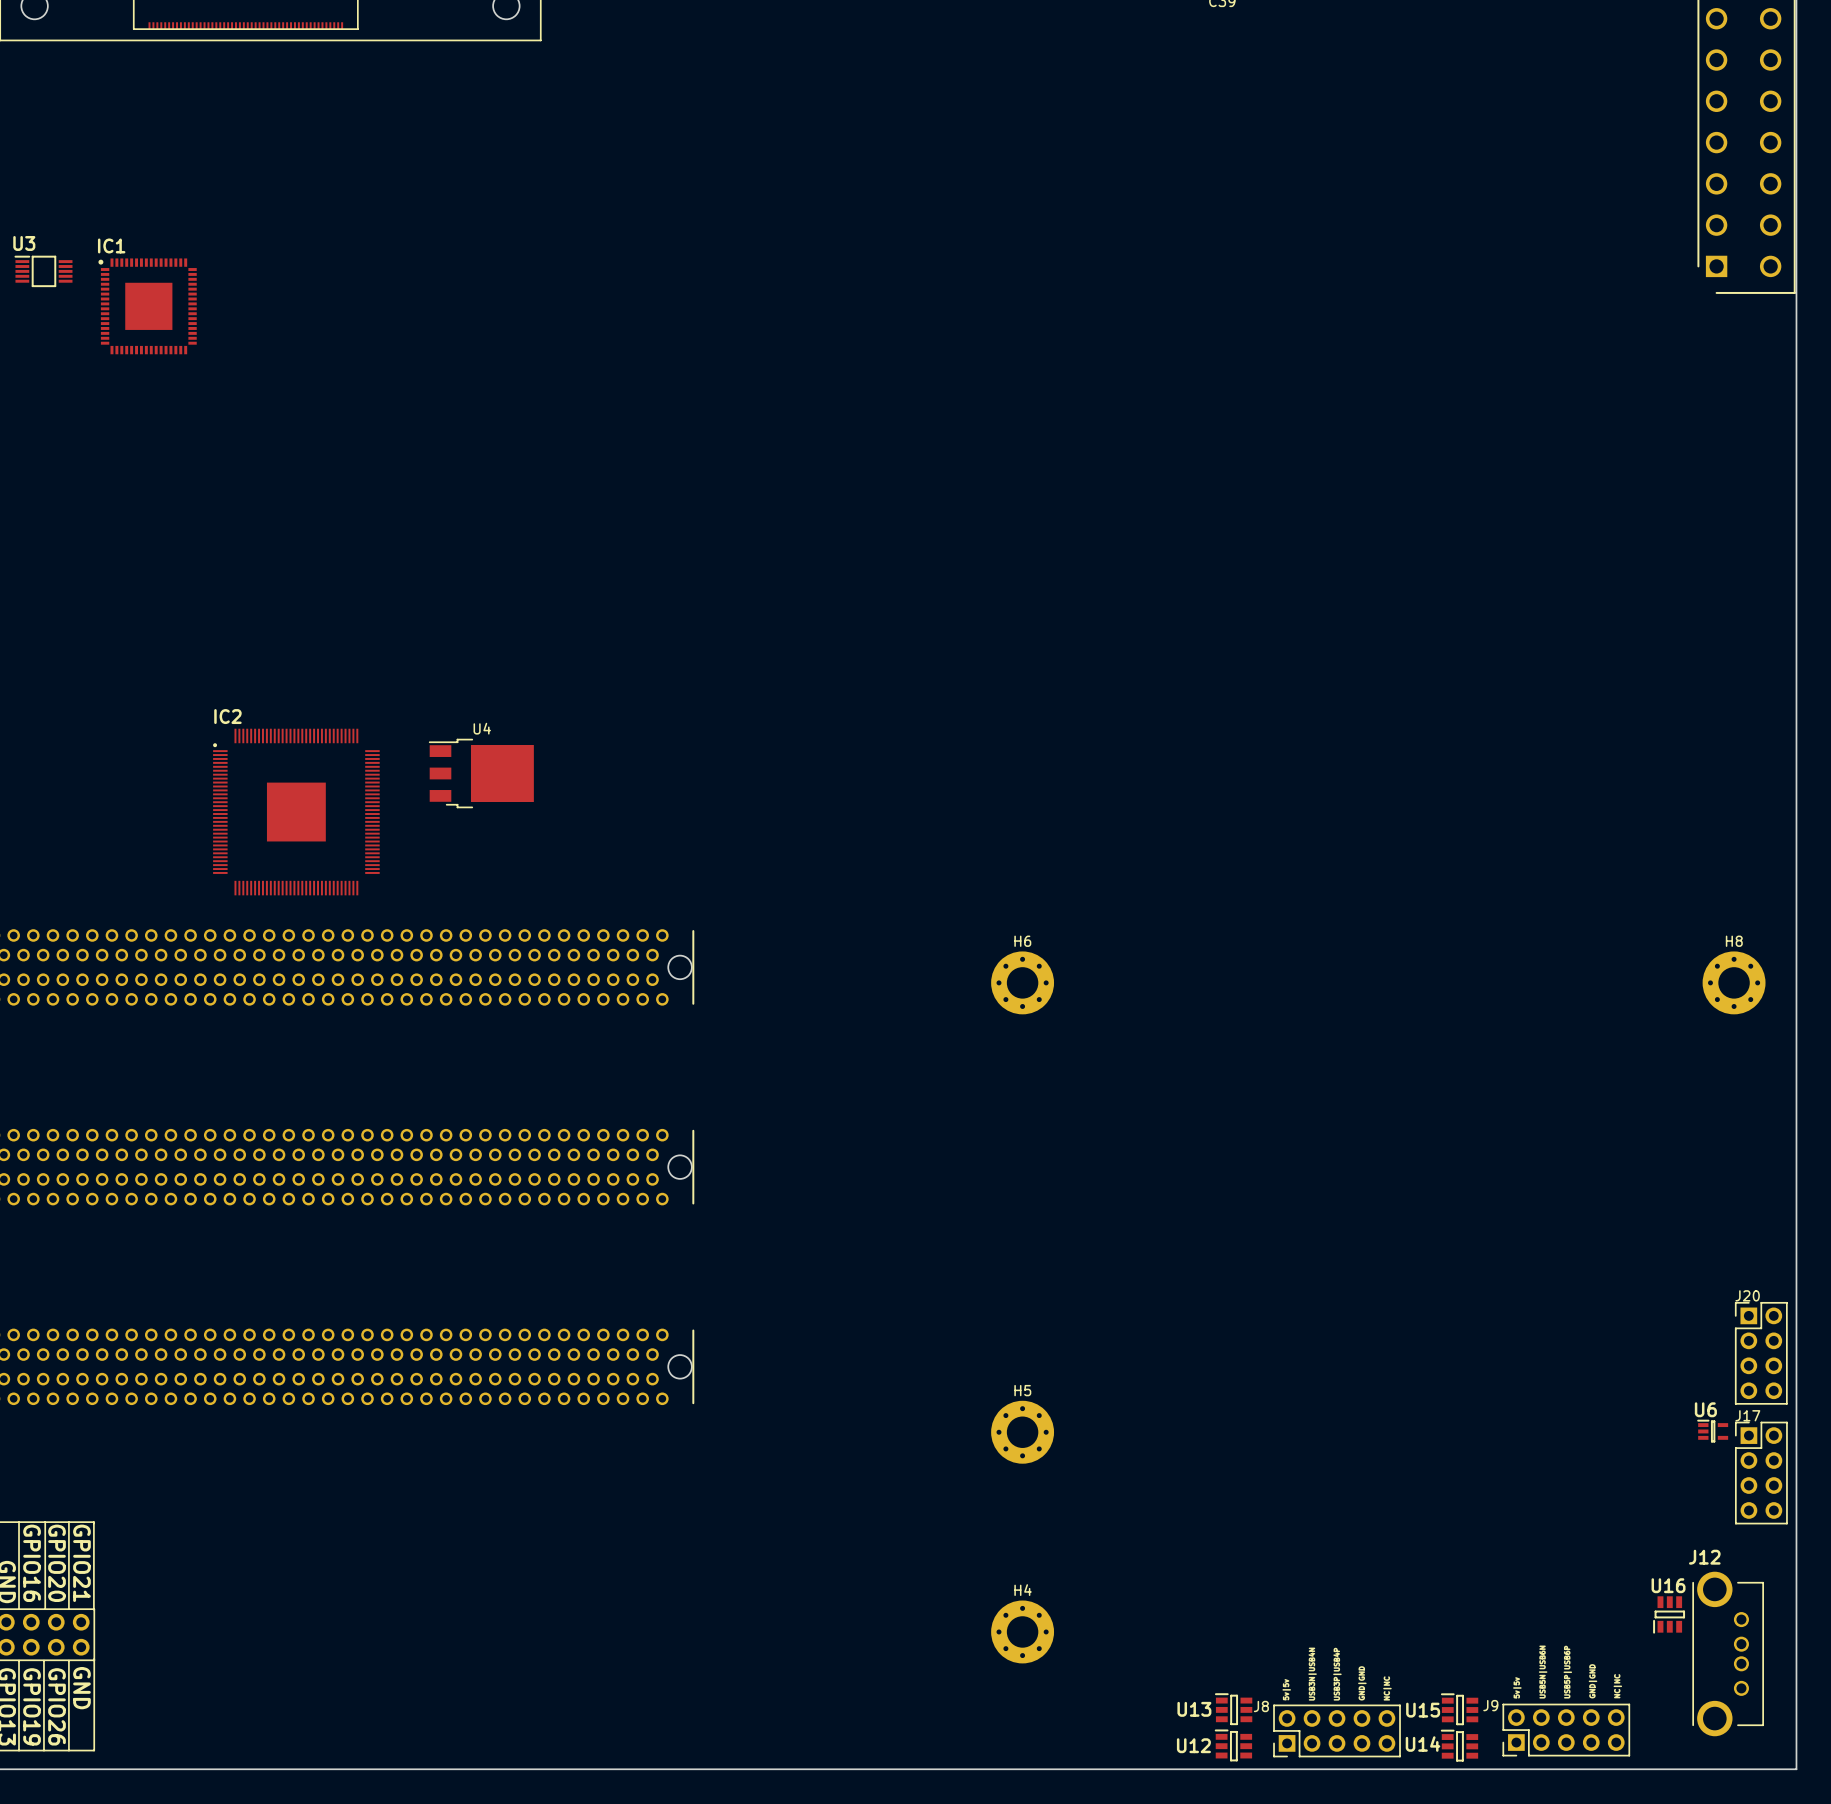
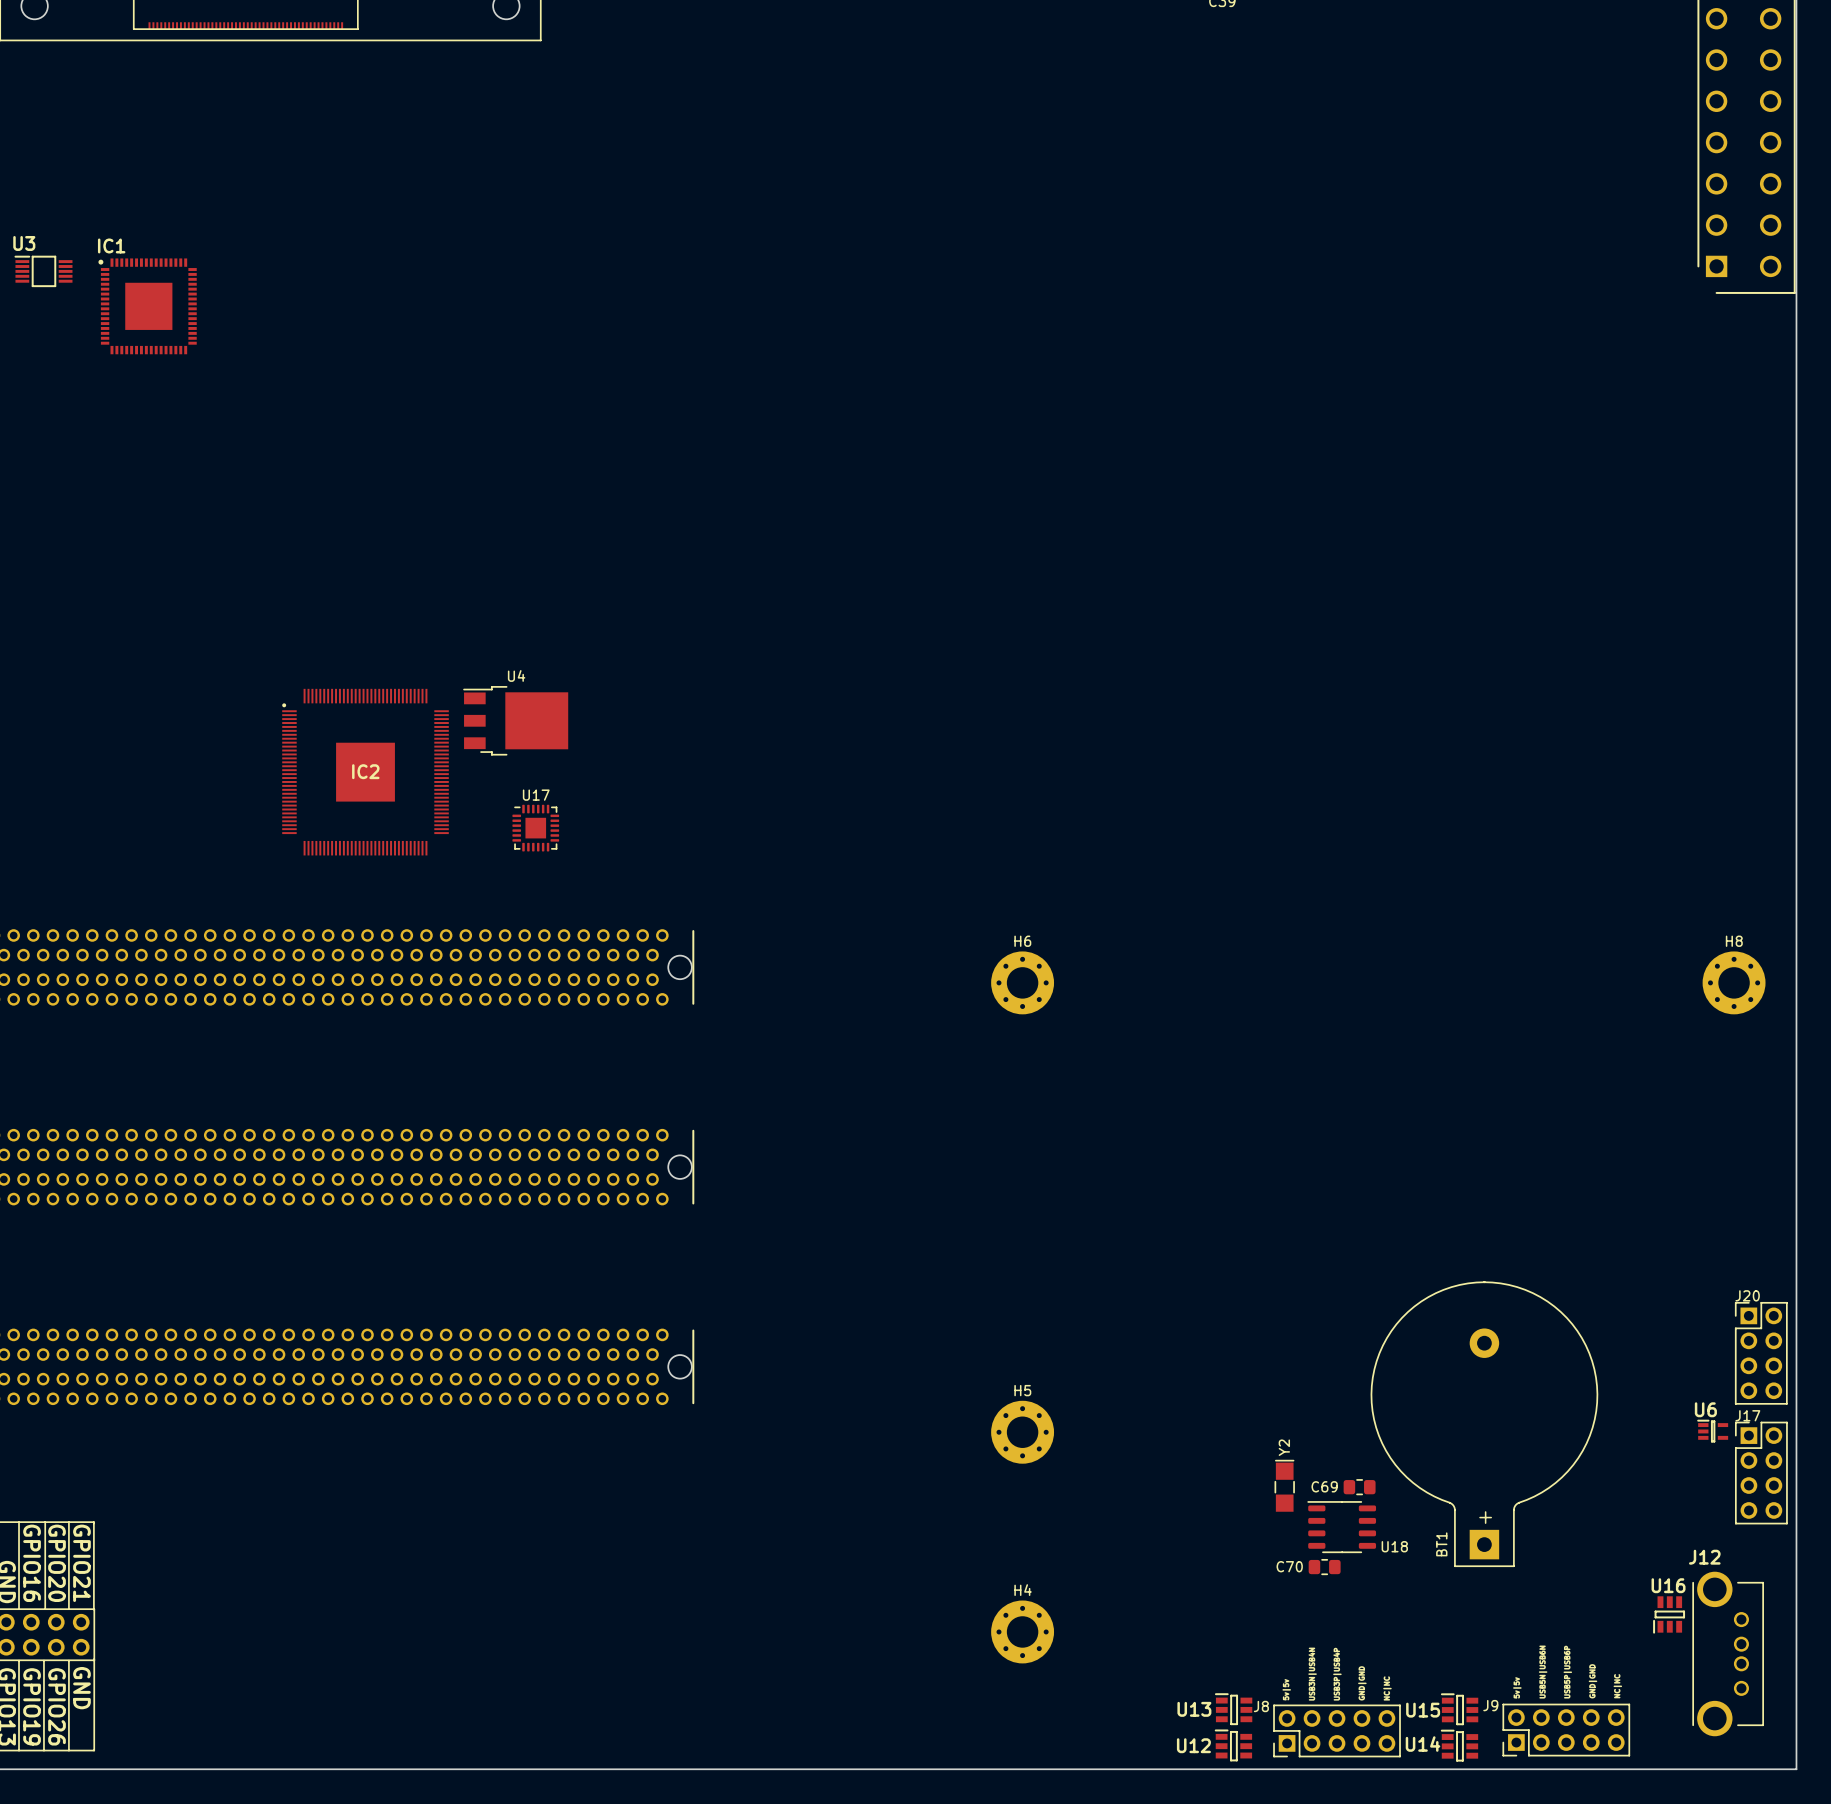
IC2 name position: IC2 (227, 716) -> IC2 (365, 771)
U4 position: (481, 773) -> (515, 720)
IC2 position: (296, 812) -> (365, 772)
U17: none -> (535, 828)
BT1: none -> (1484, 1424)
Y2: none -> (1284, 1485)
C69: none -> (1359, 1487)
U18: none -> (1341, 1527)
C70: none -> (1324, 1567)

